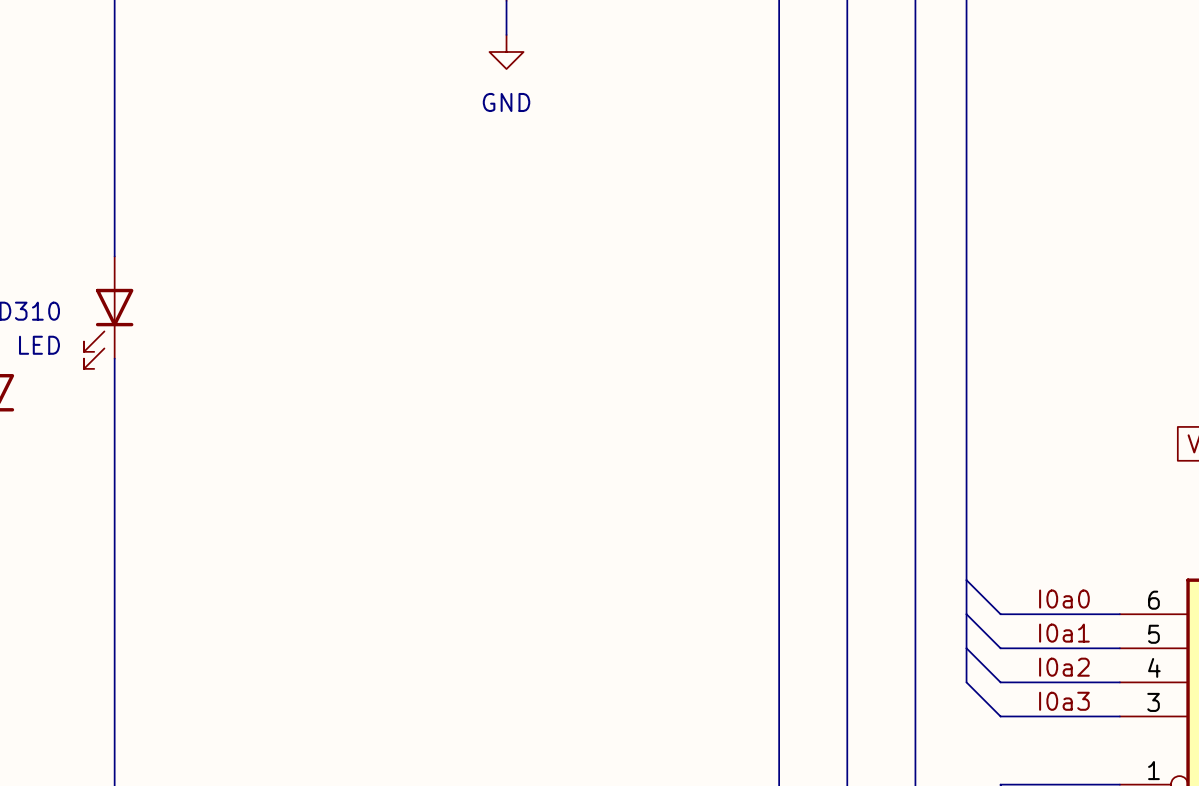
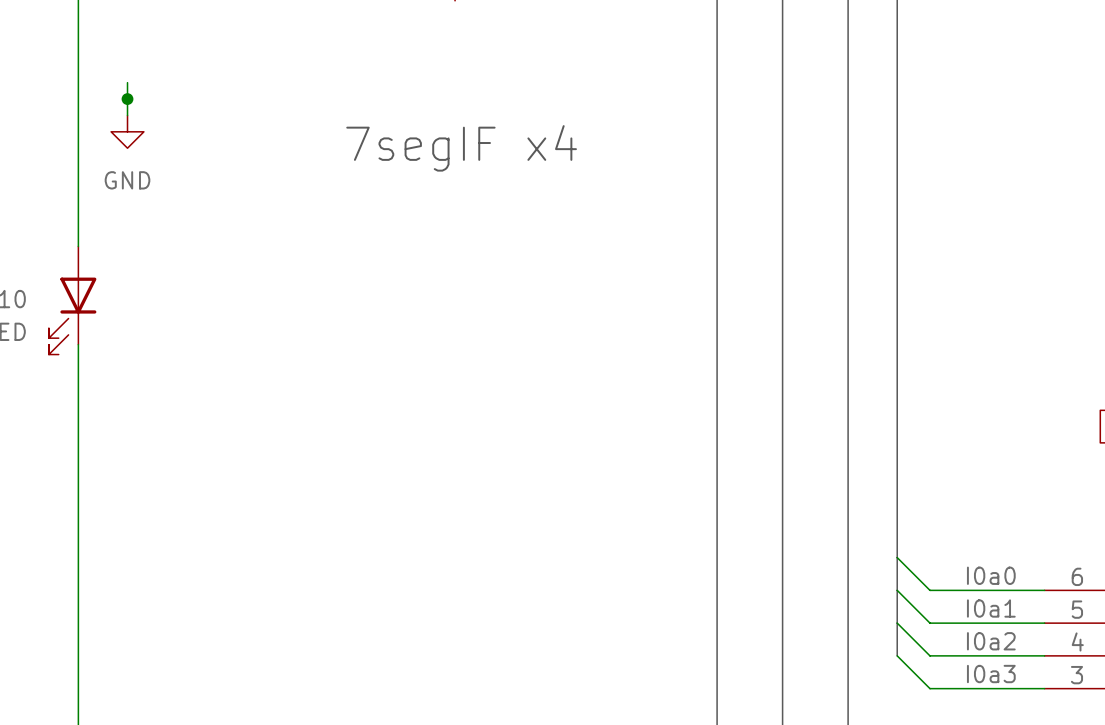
wire: (506, 0) (506, 34) -> none
power symbol: GND (506, 52) -> none
wire: none -> (127, 82) (127, 115)
junction: none -> (127, 99)
power symbol: none -> GND (127, 131)
text: none -> 7segIF x4 (461, 148)

